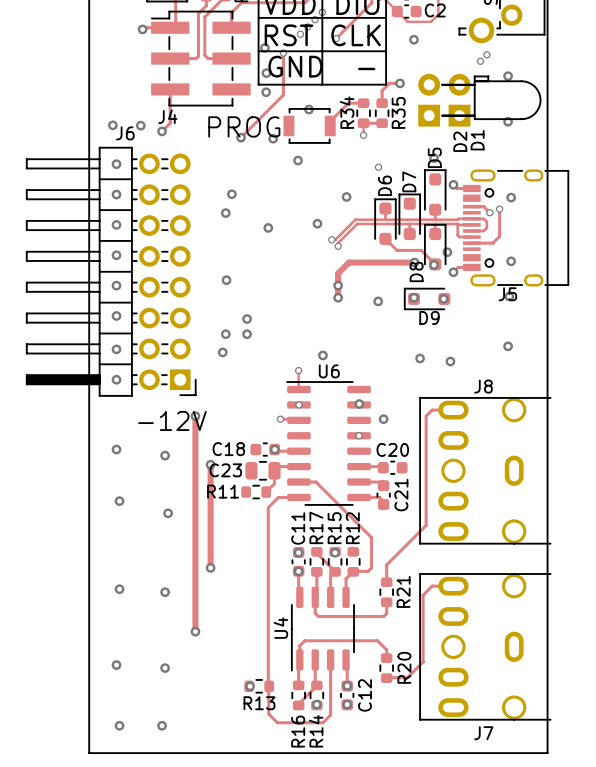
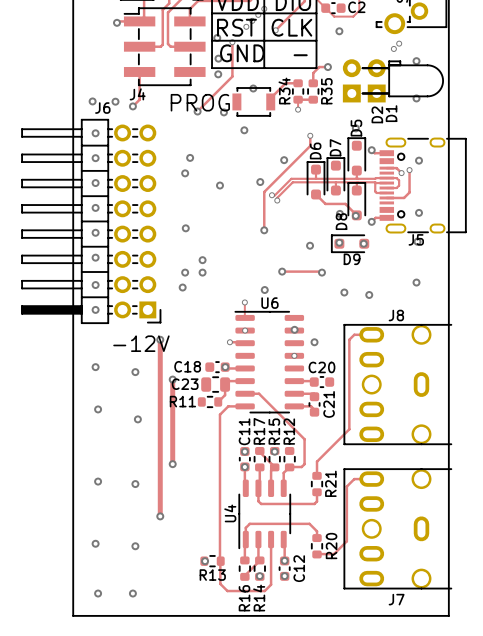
track: none -> (310, 135) (310, 145) (264, 191) (264, 230)
via: (447, 252) -> none
track: (414, 262) (349, 262) (338, 273) (338, 297) -> none
via: none -> (264, 230)
via: (338, 285) -> none
via: (338, 297) -> none
track: none -> (282, 271) (321, 272)
via: none -> (282, 271)
via: none -> (321, 272)

